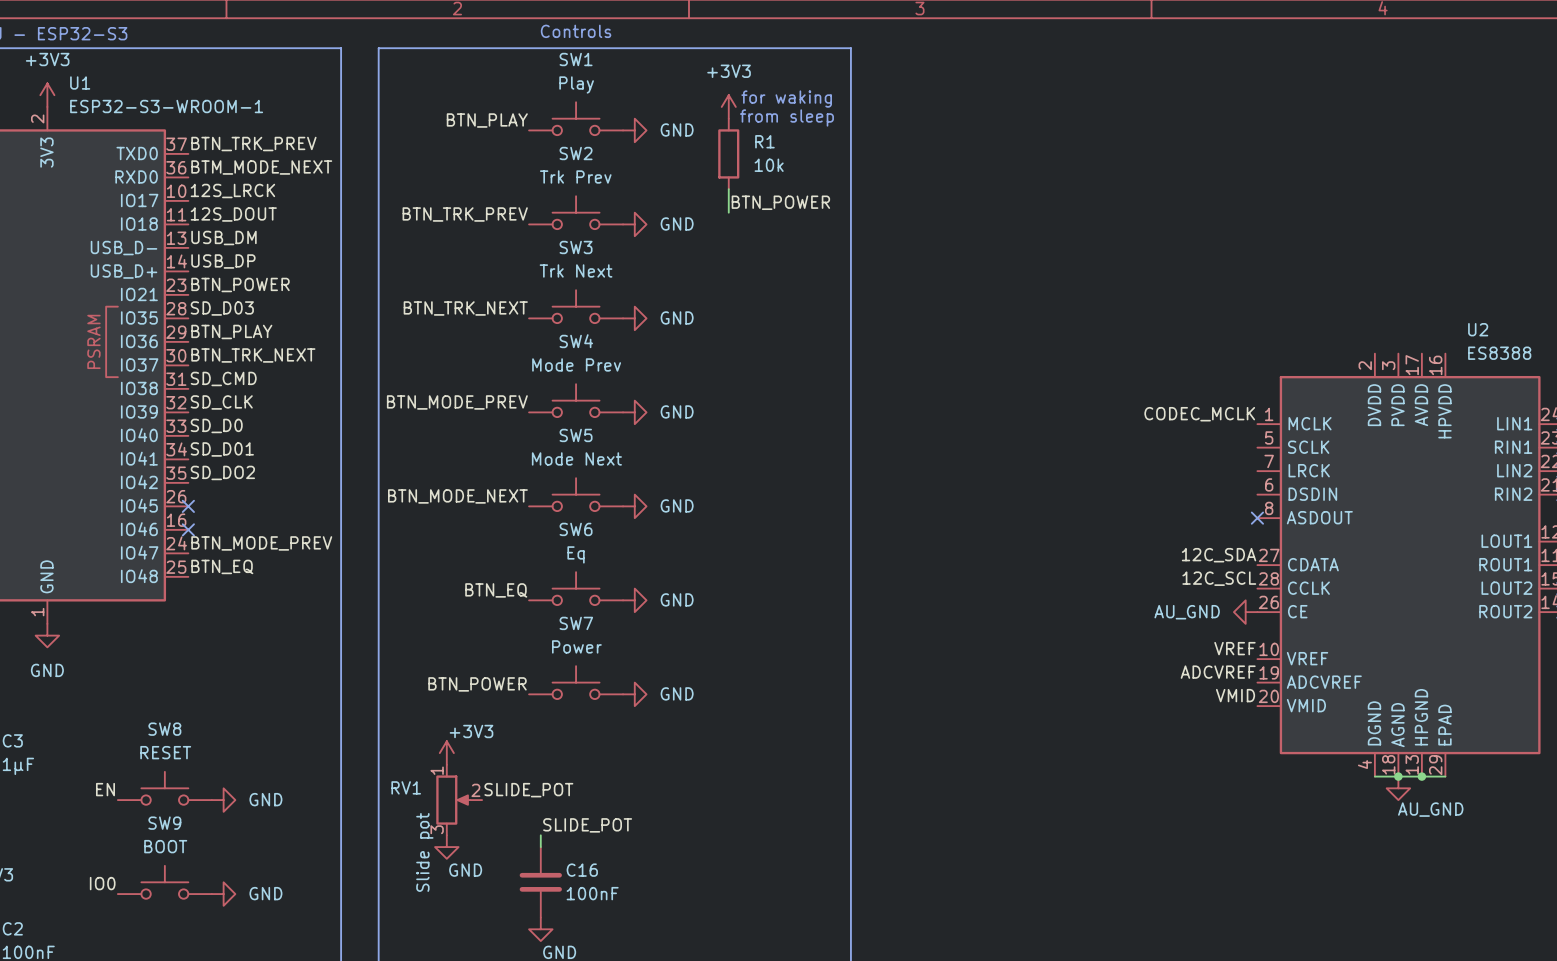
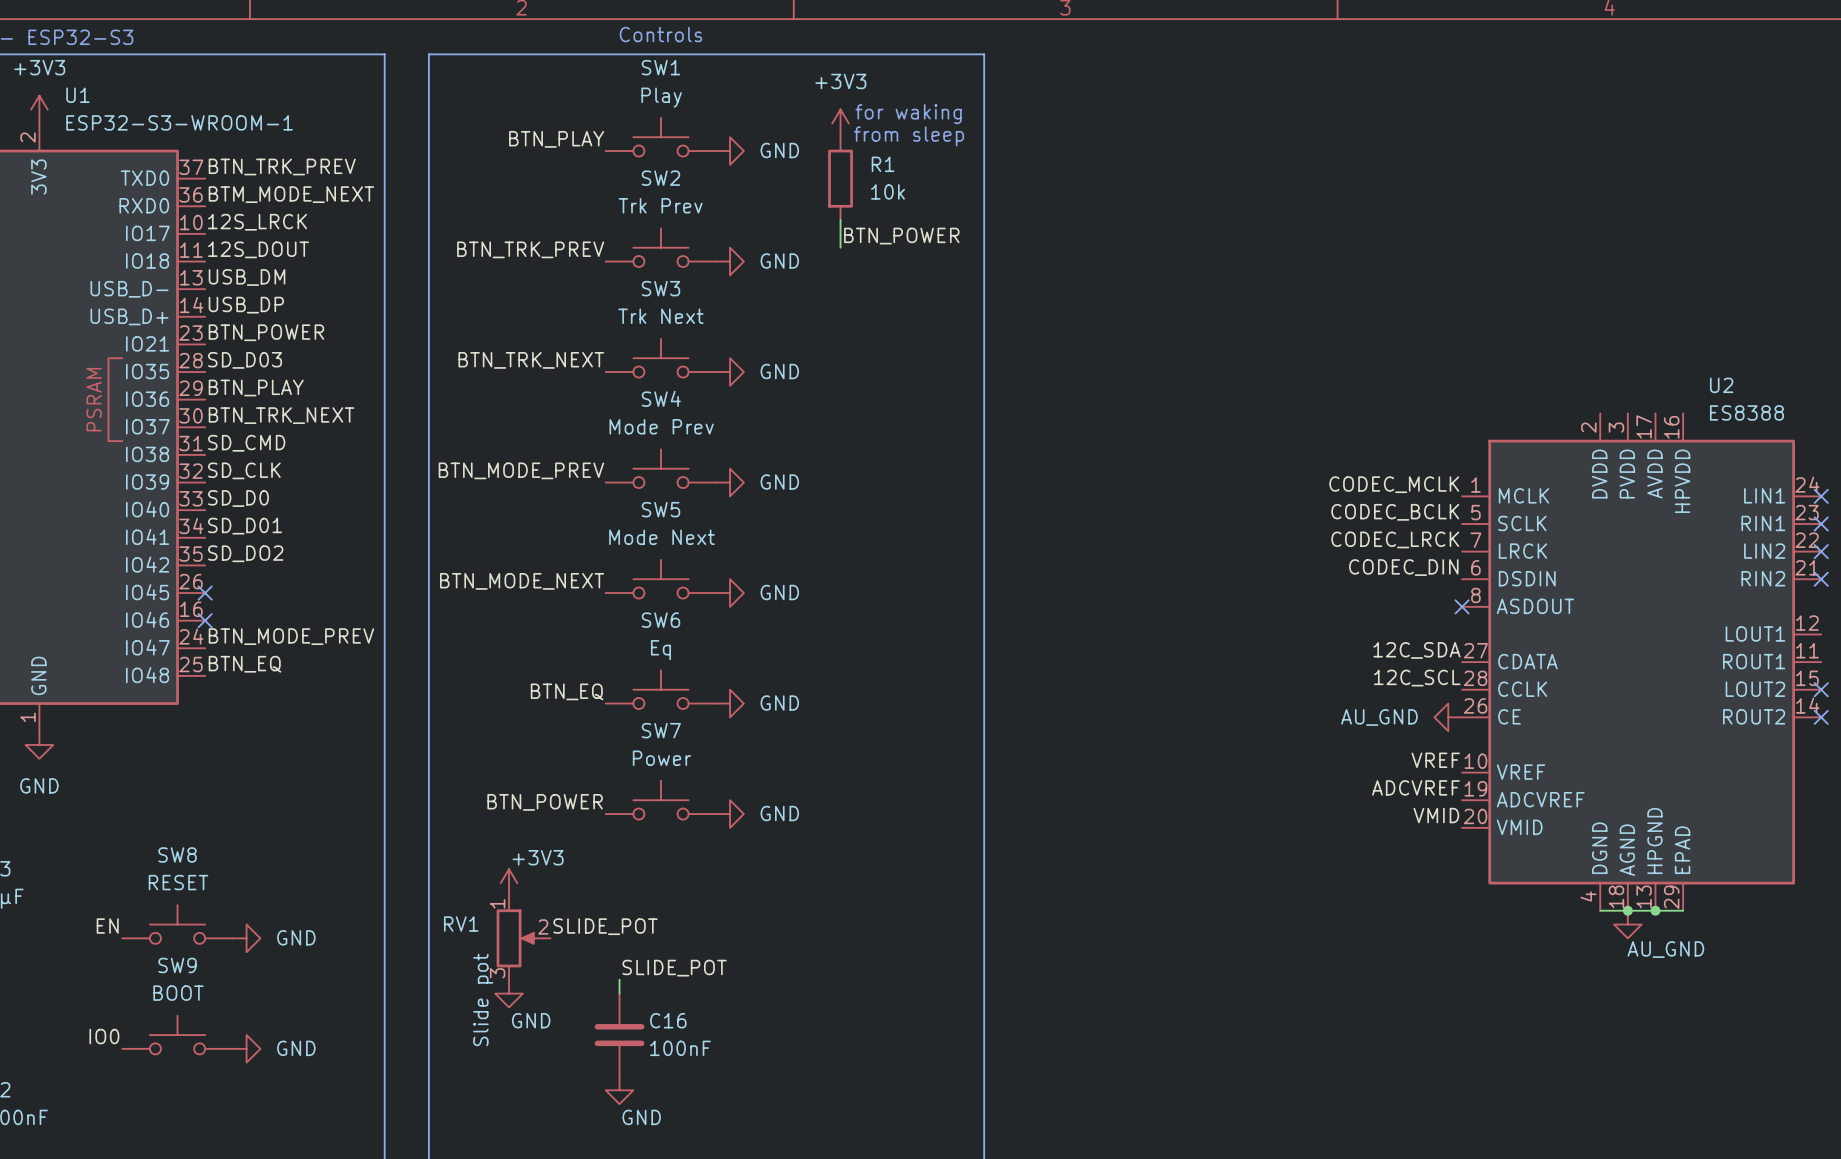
label: none -> CODEC_BCLK (1395, 512)
label: none -> CODEC_LRCK (1395, 539)
label: none -> CODEC_DIN (1403, 567)

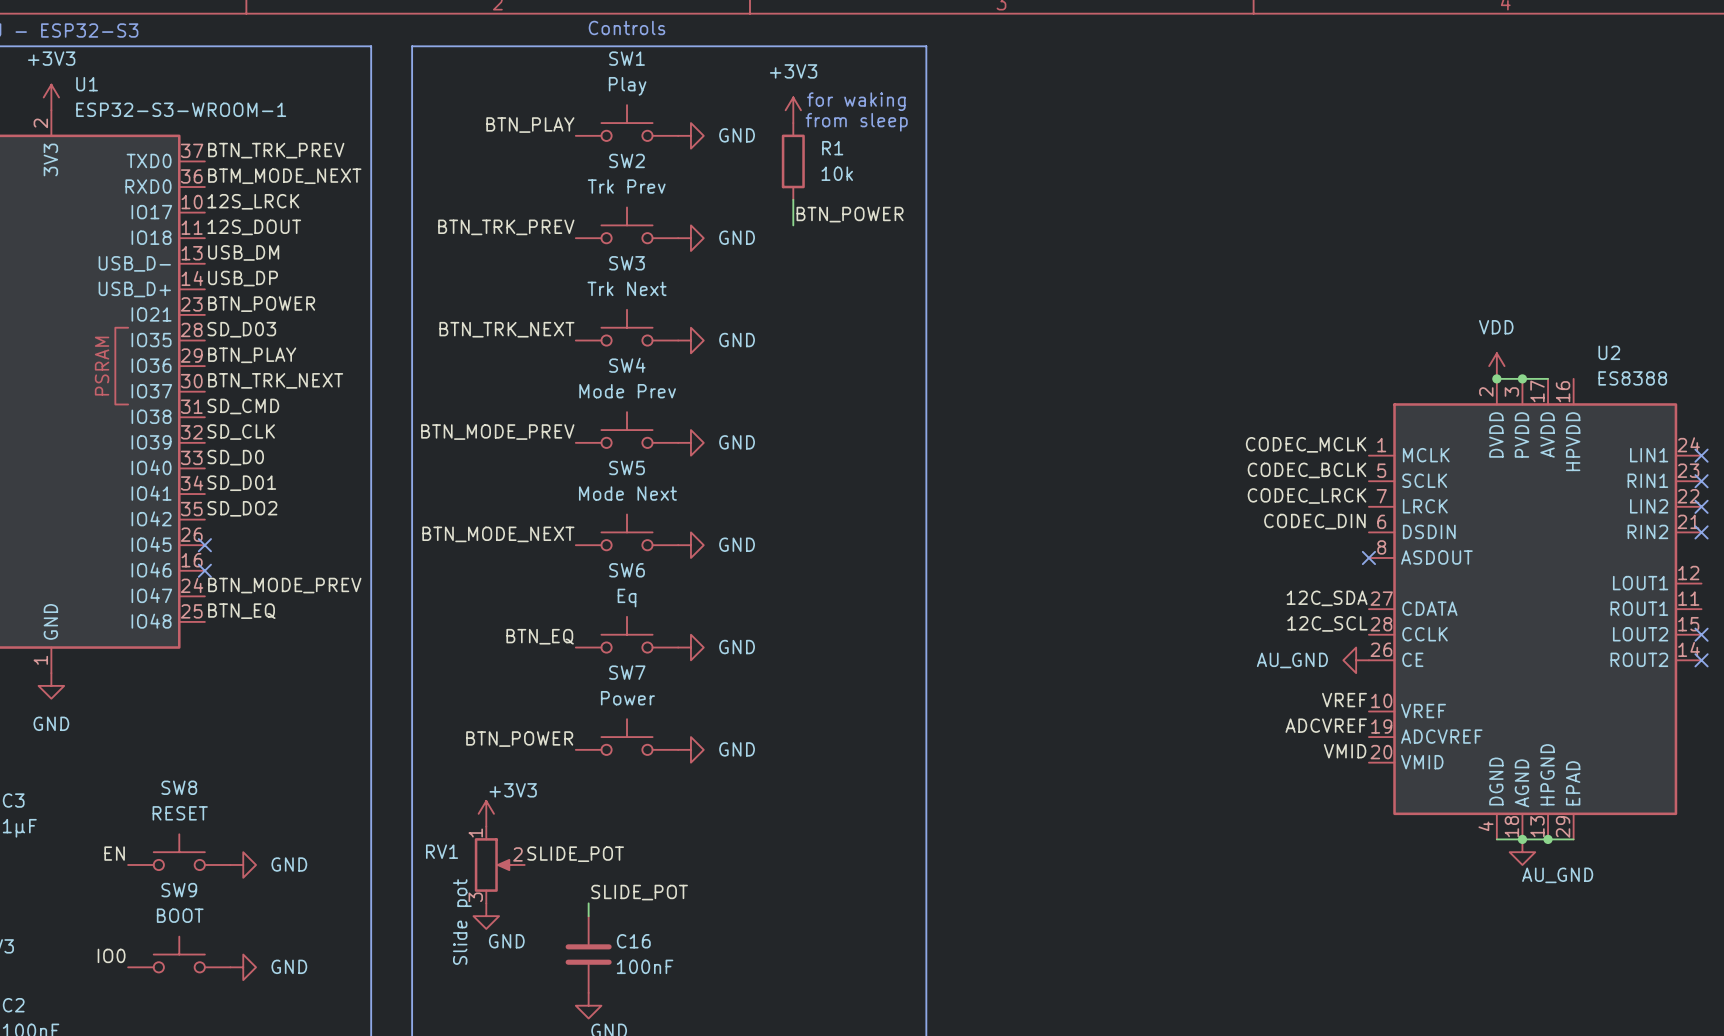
power symbol: none -> VDD (1496, 366)
wire: none -> (1496, 378) (1548, 378)
junction: none -> (1496, 378)
junction: none -> (1522, 378)

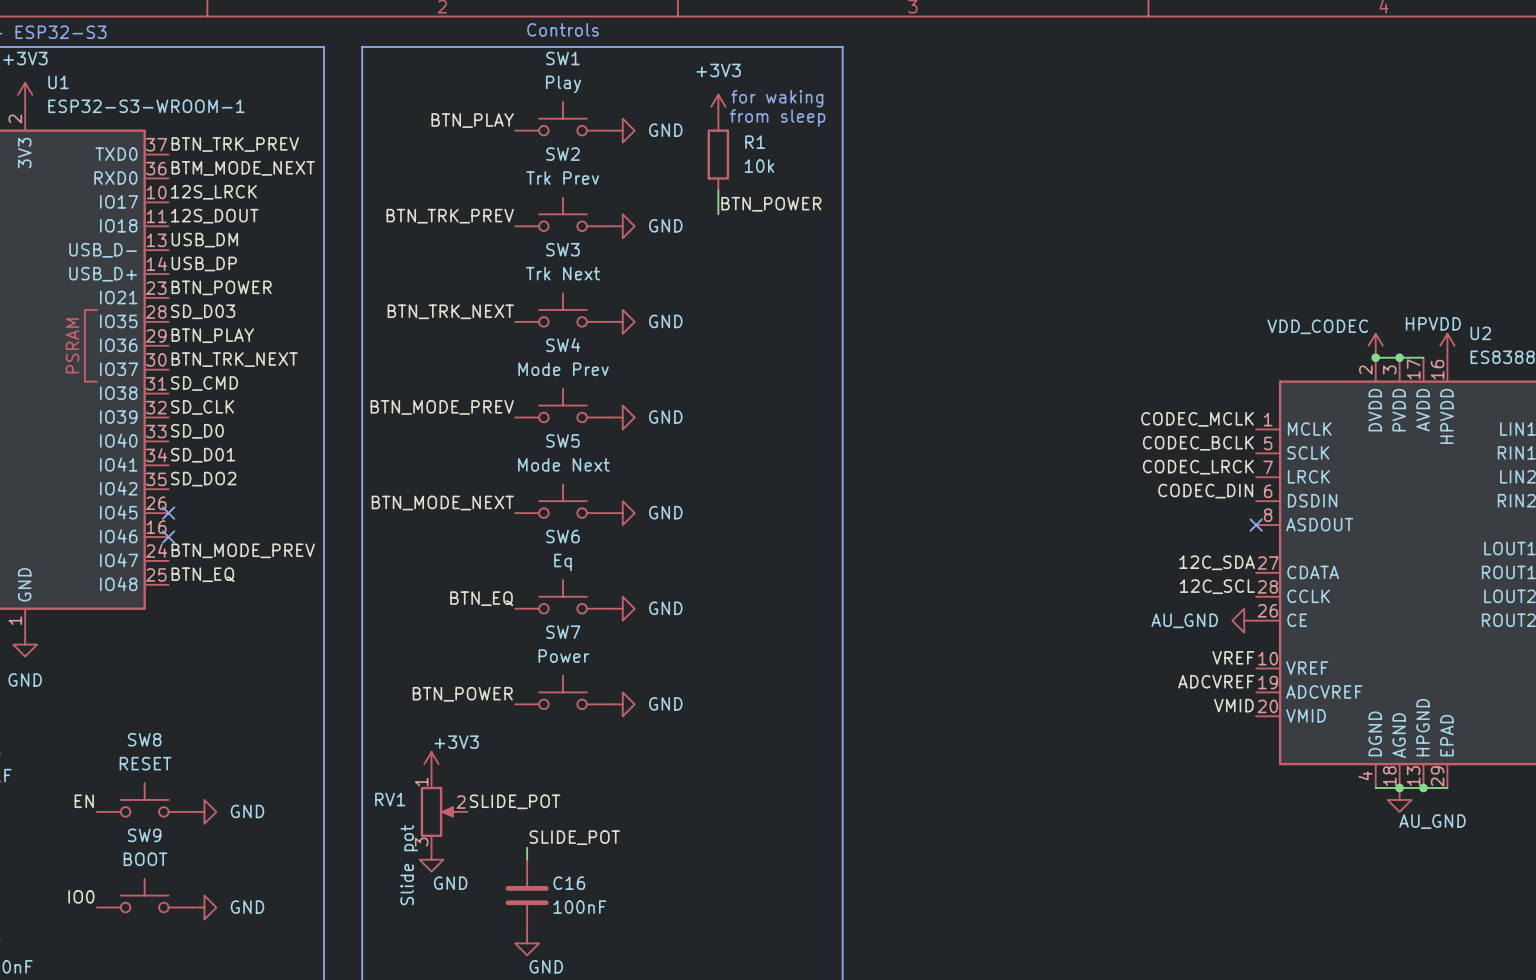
power symbol: VDD (1496, 366) -> VDD_CODEC (1375, 345)
power symbol: none -> HPVDD (1447, 345)

